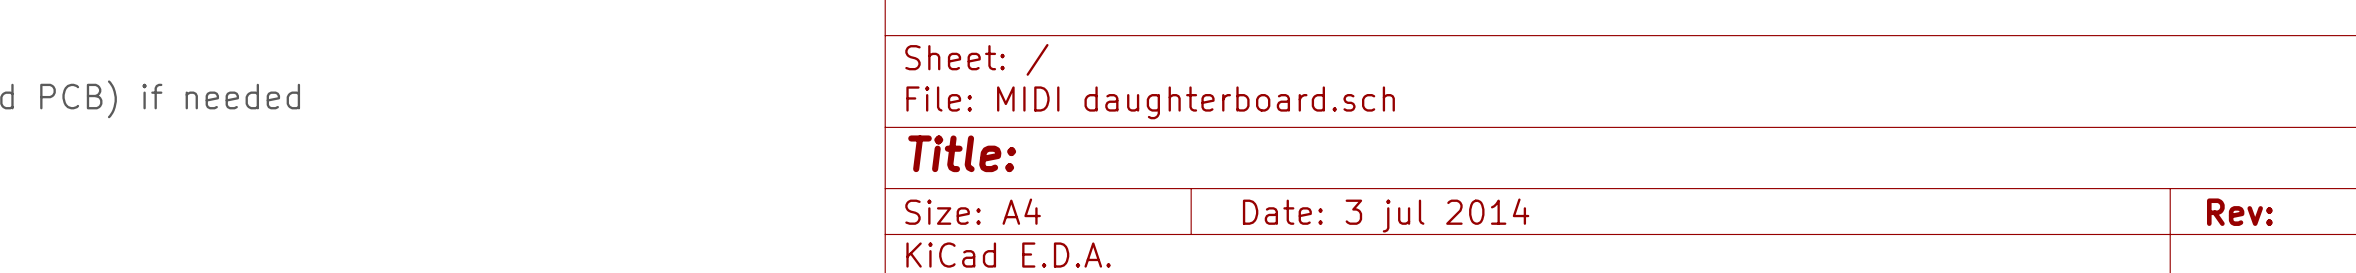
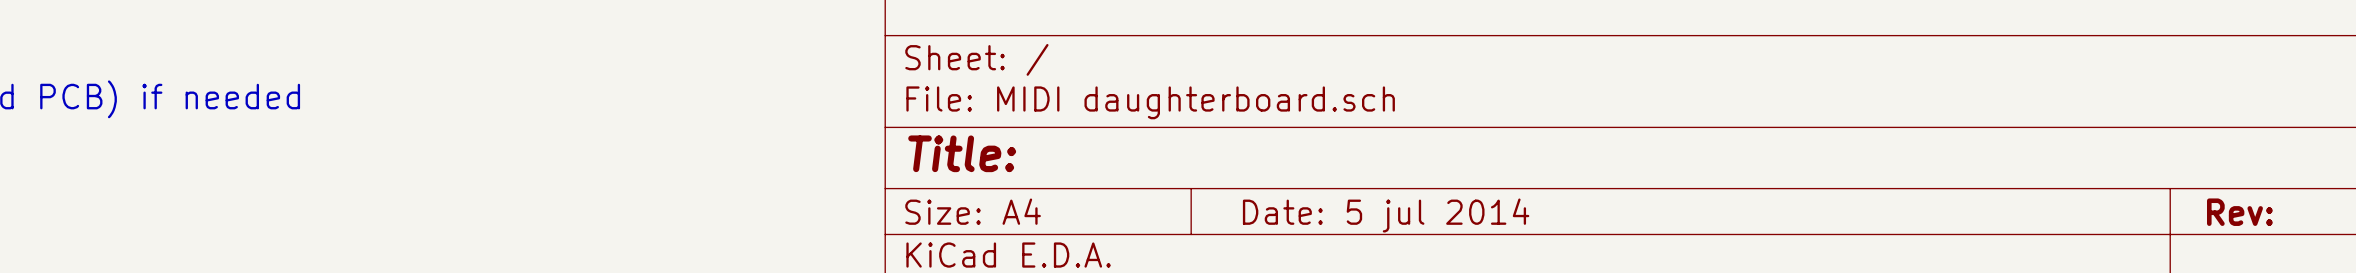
title block: Date: 3 jul 2014 (1386, 215) -> Date: 5 jul 2014 (1386, 215)

